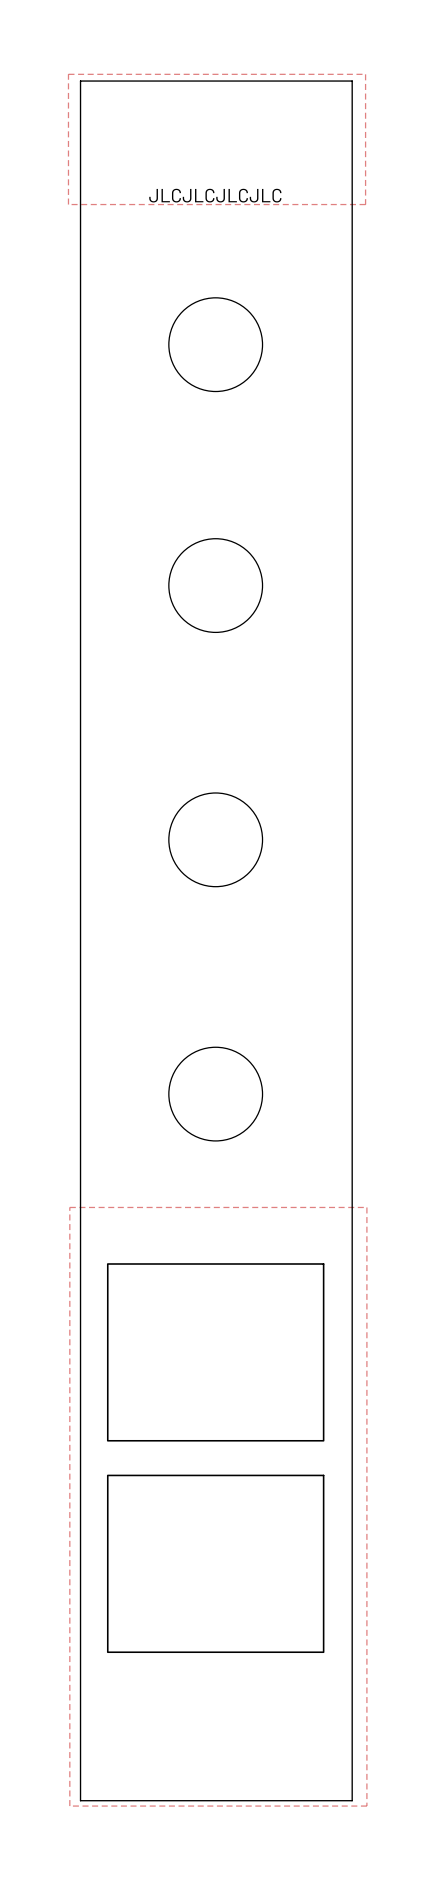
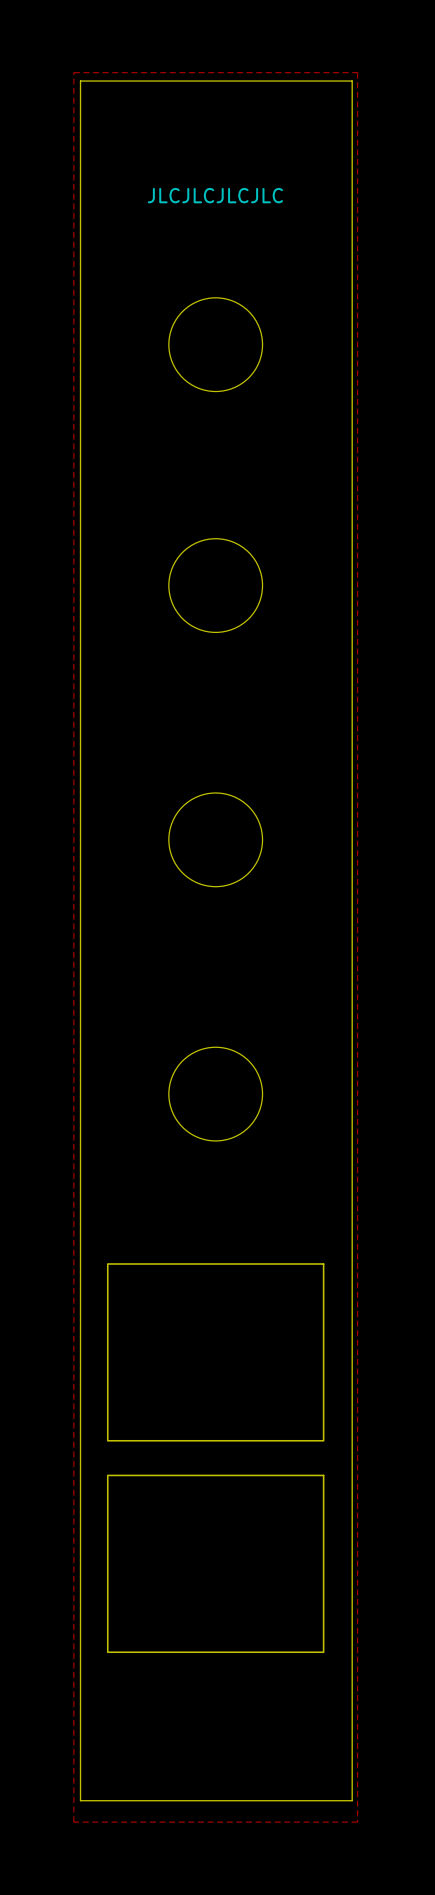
zone outline: none -> (73, 72) (73, 1822) (357, 1822) (357, 72) (73, 72)
zone outline: (68, 74) (68, 204) (365, 204) (365, 74) (68, 74) -> none
zone outline: (69, 1207) (69, 1806) (366, 1806) (366, 1207) (69, 1207) -> none

